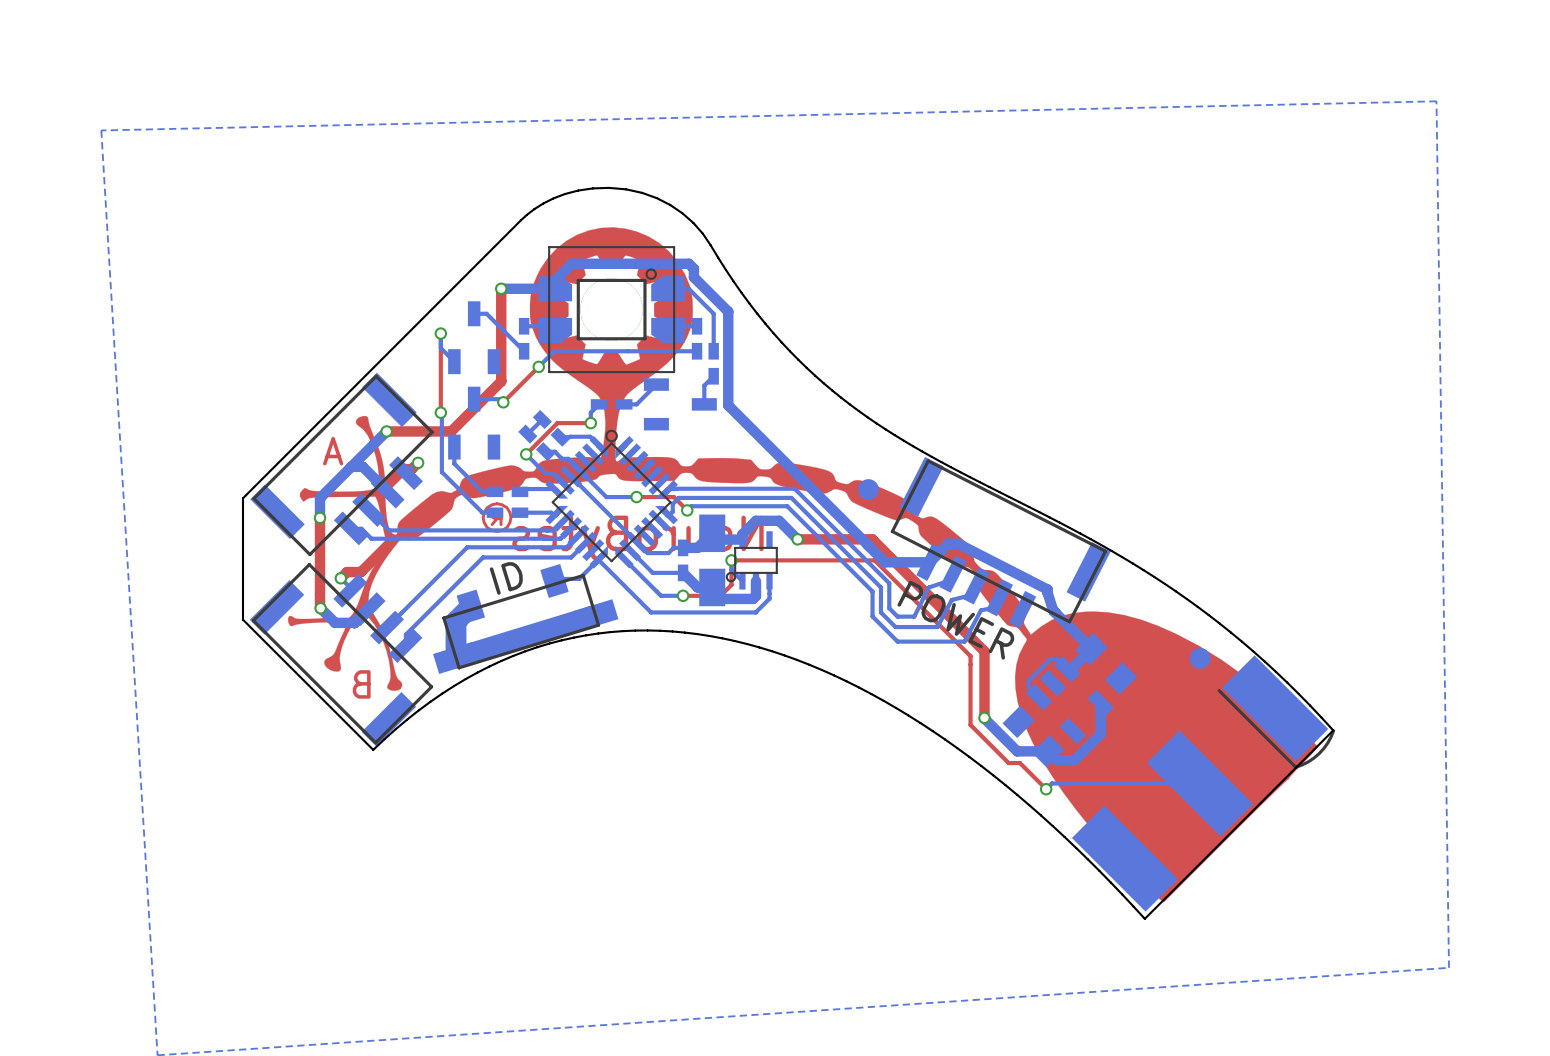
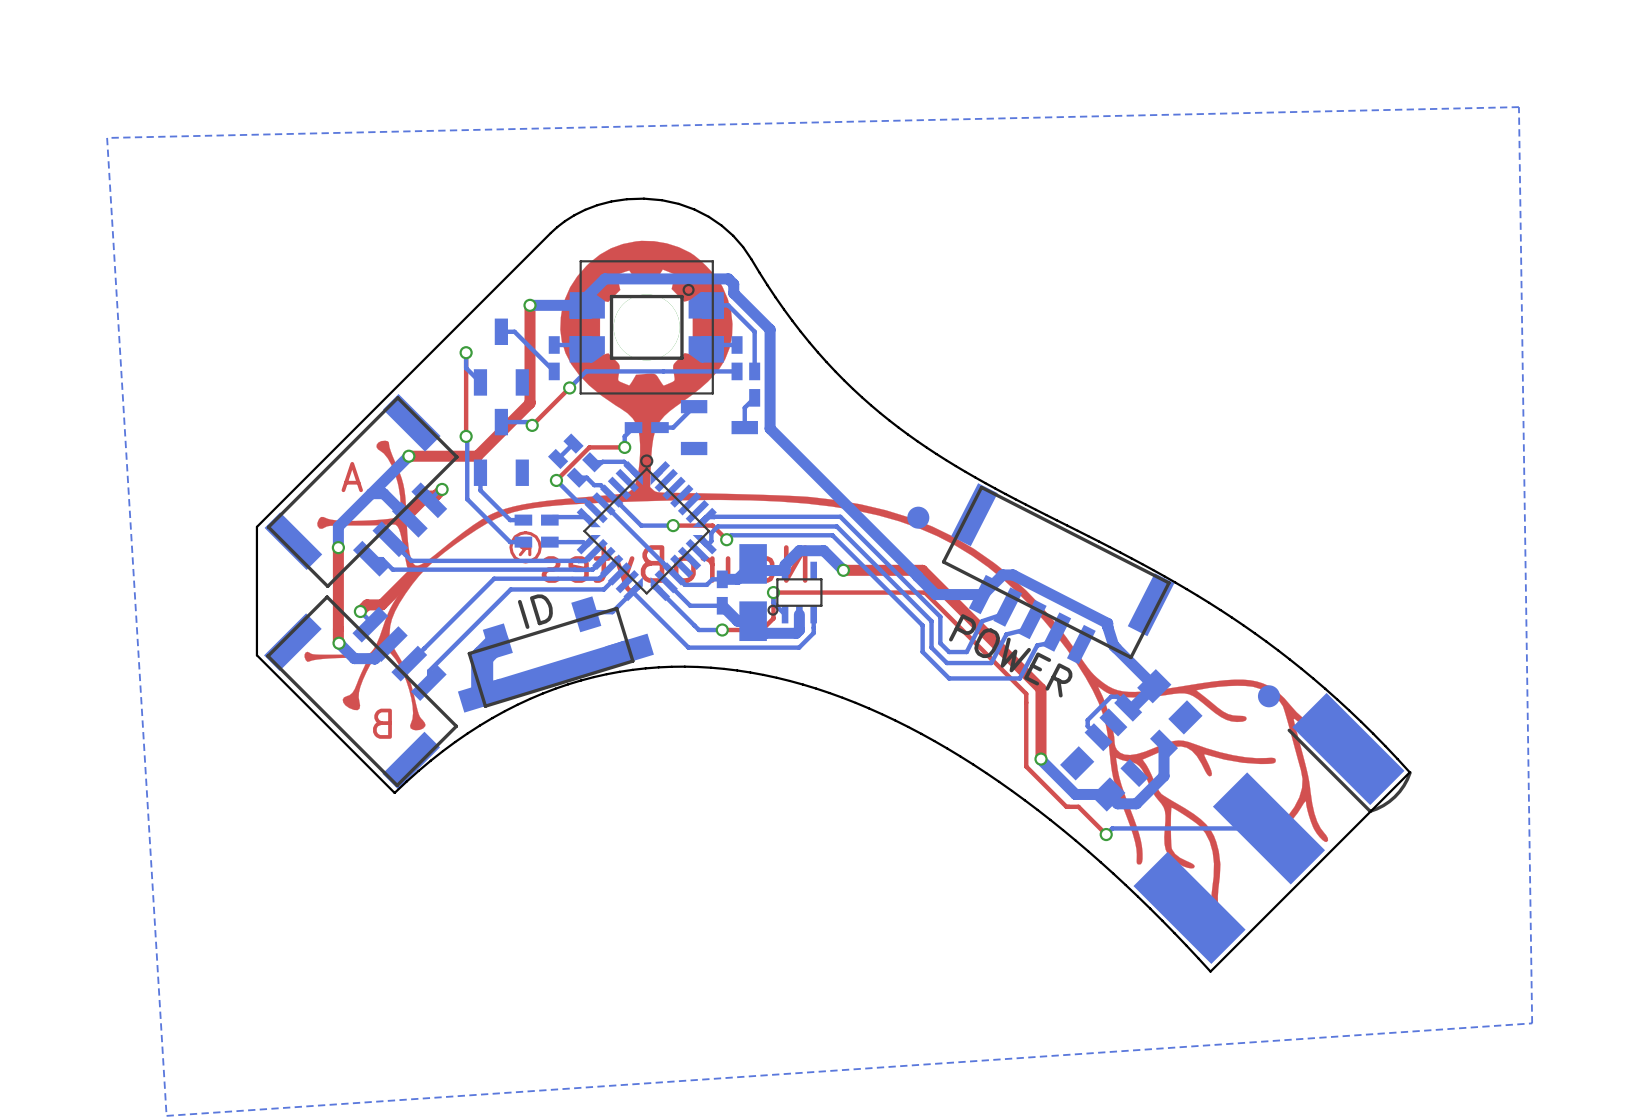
drawing shape: [287, 227, 1318, 903] -> [304, 240, 1378, 926]

